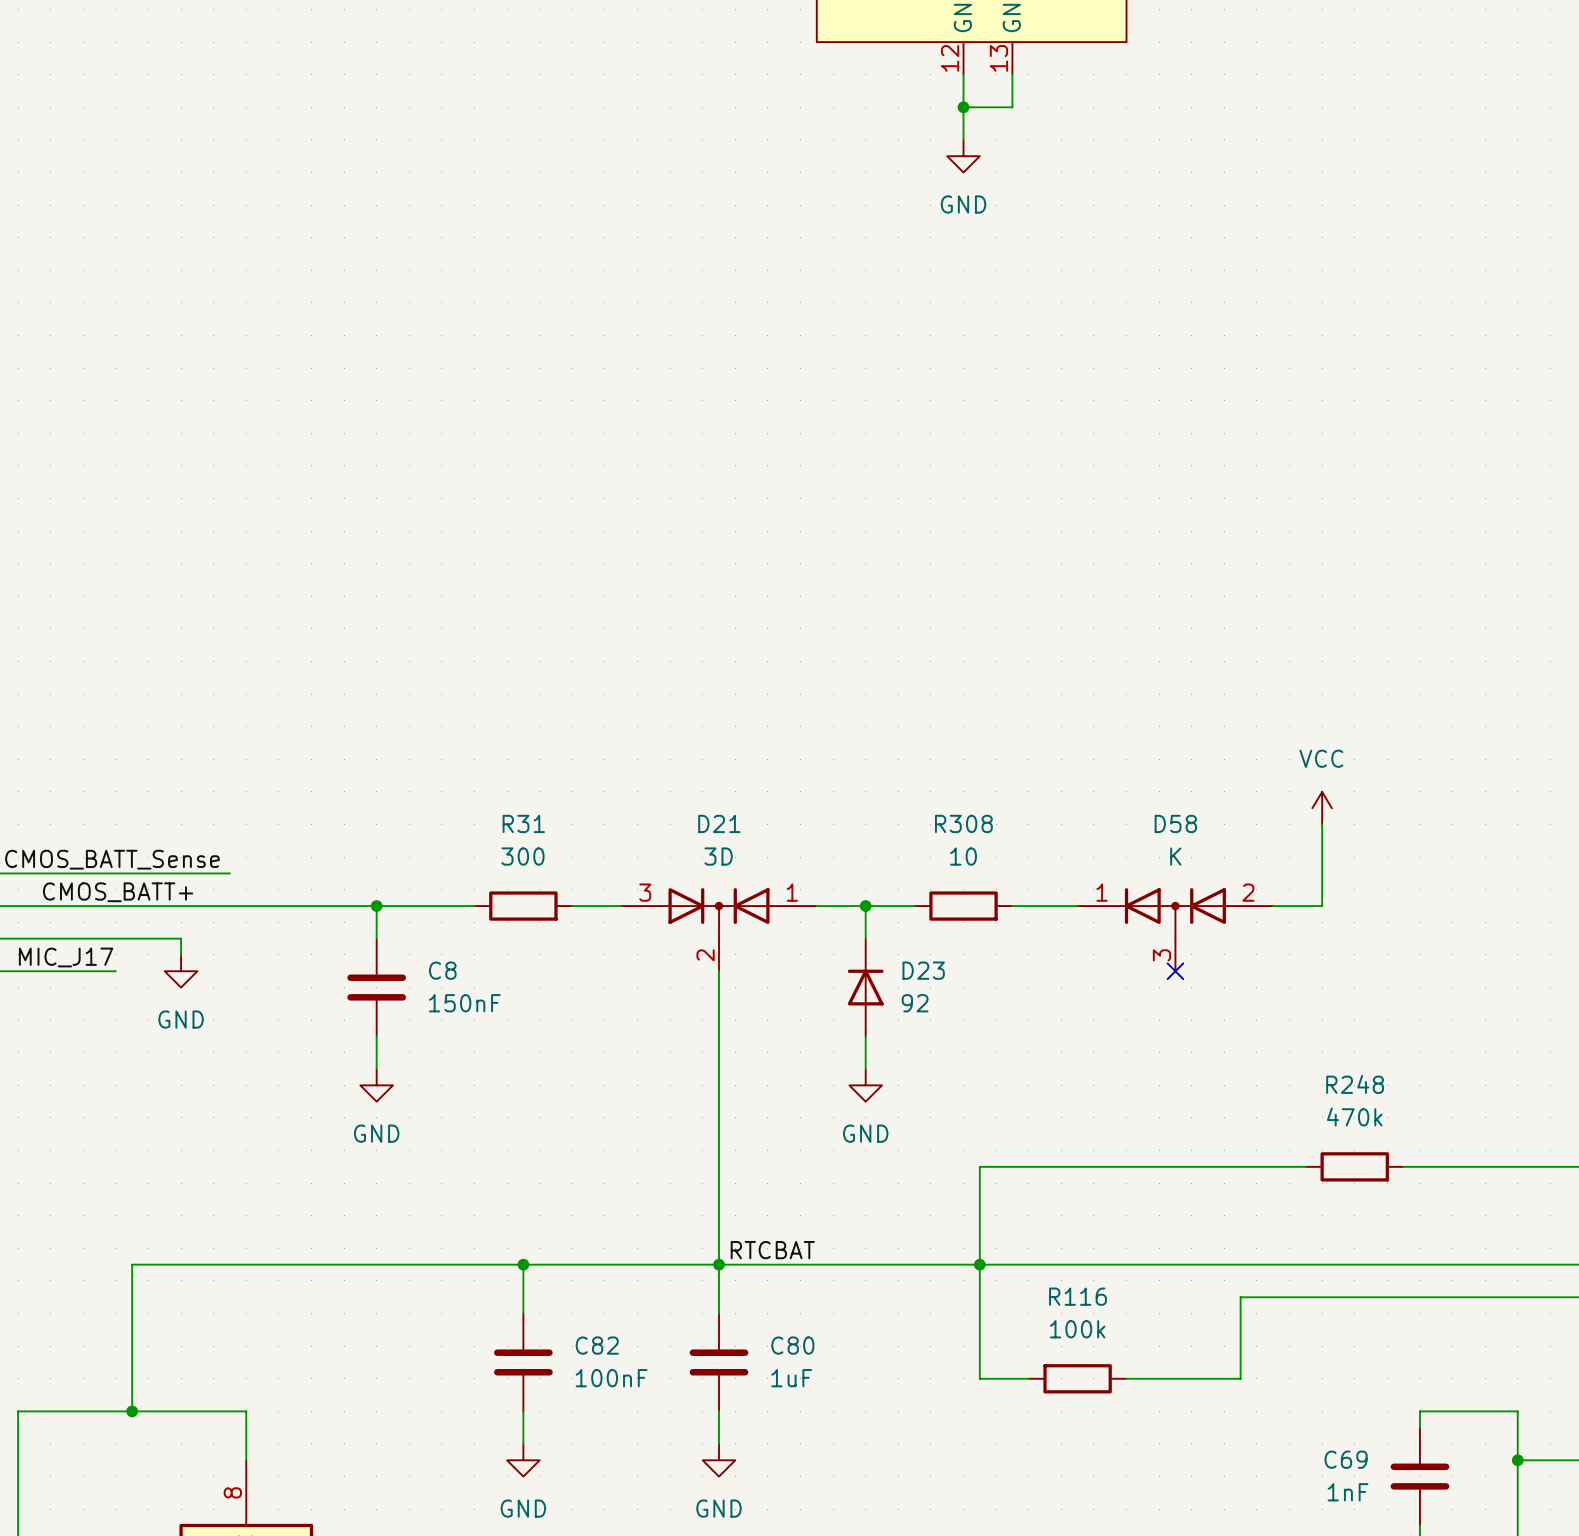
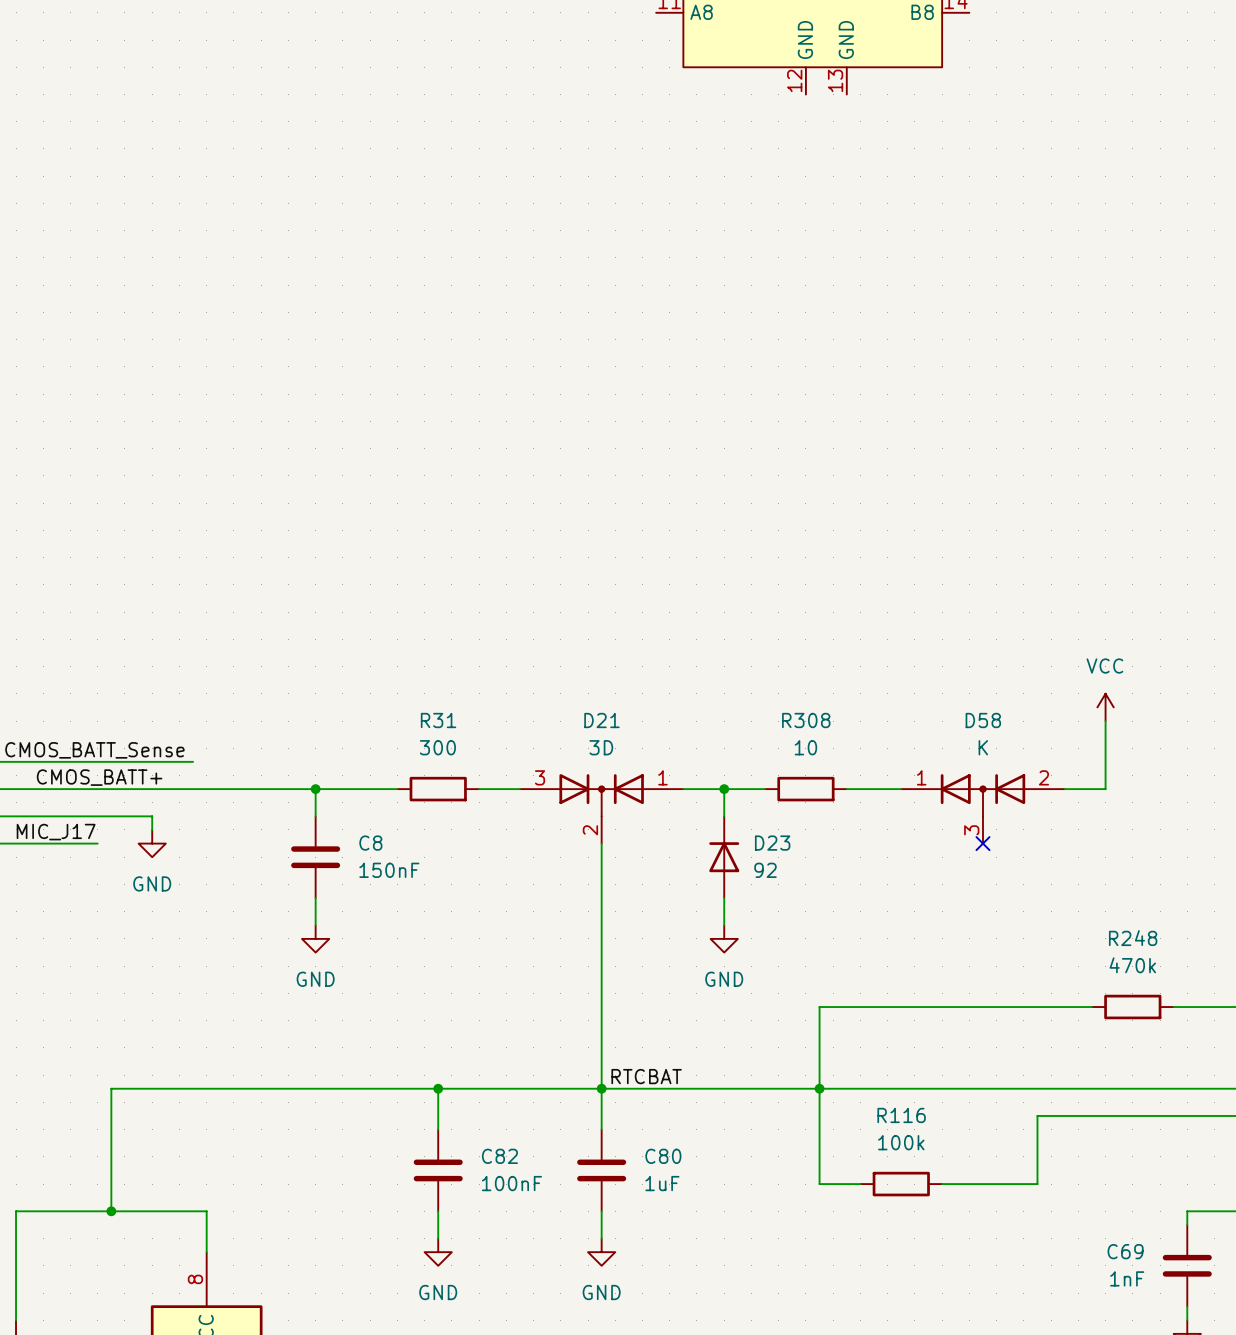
wire: (963, 74) (963, 139) -> none
wire: (1012, 74) (1012, 107) (963, 107) -> none
junction: (963, 107) -> none
power symbol: GND (963, 156) -> none

